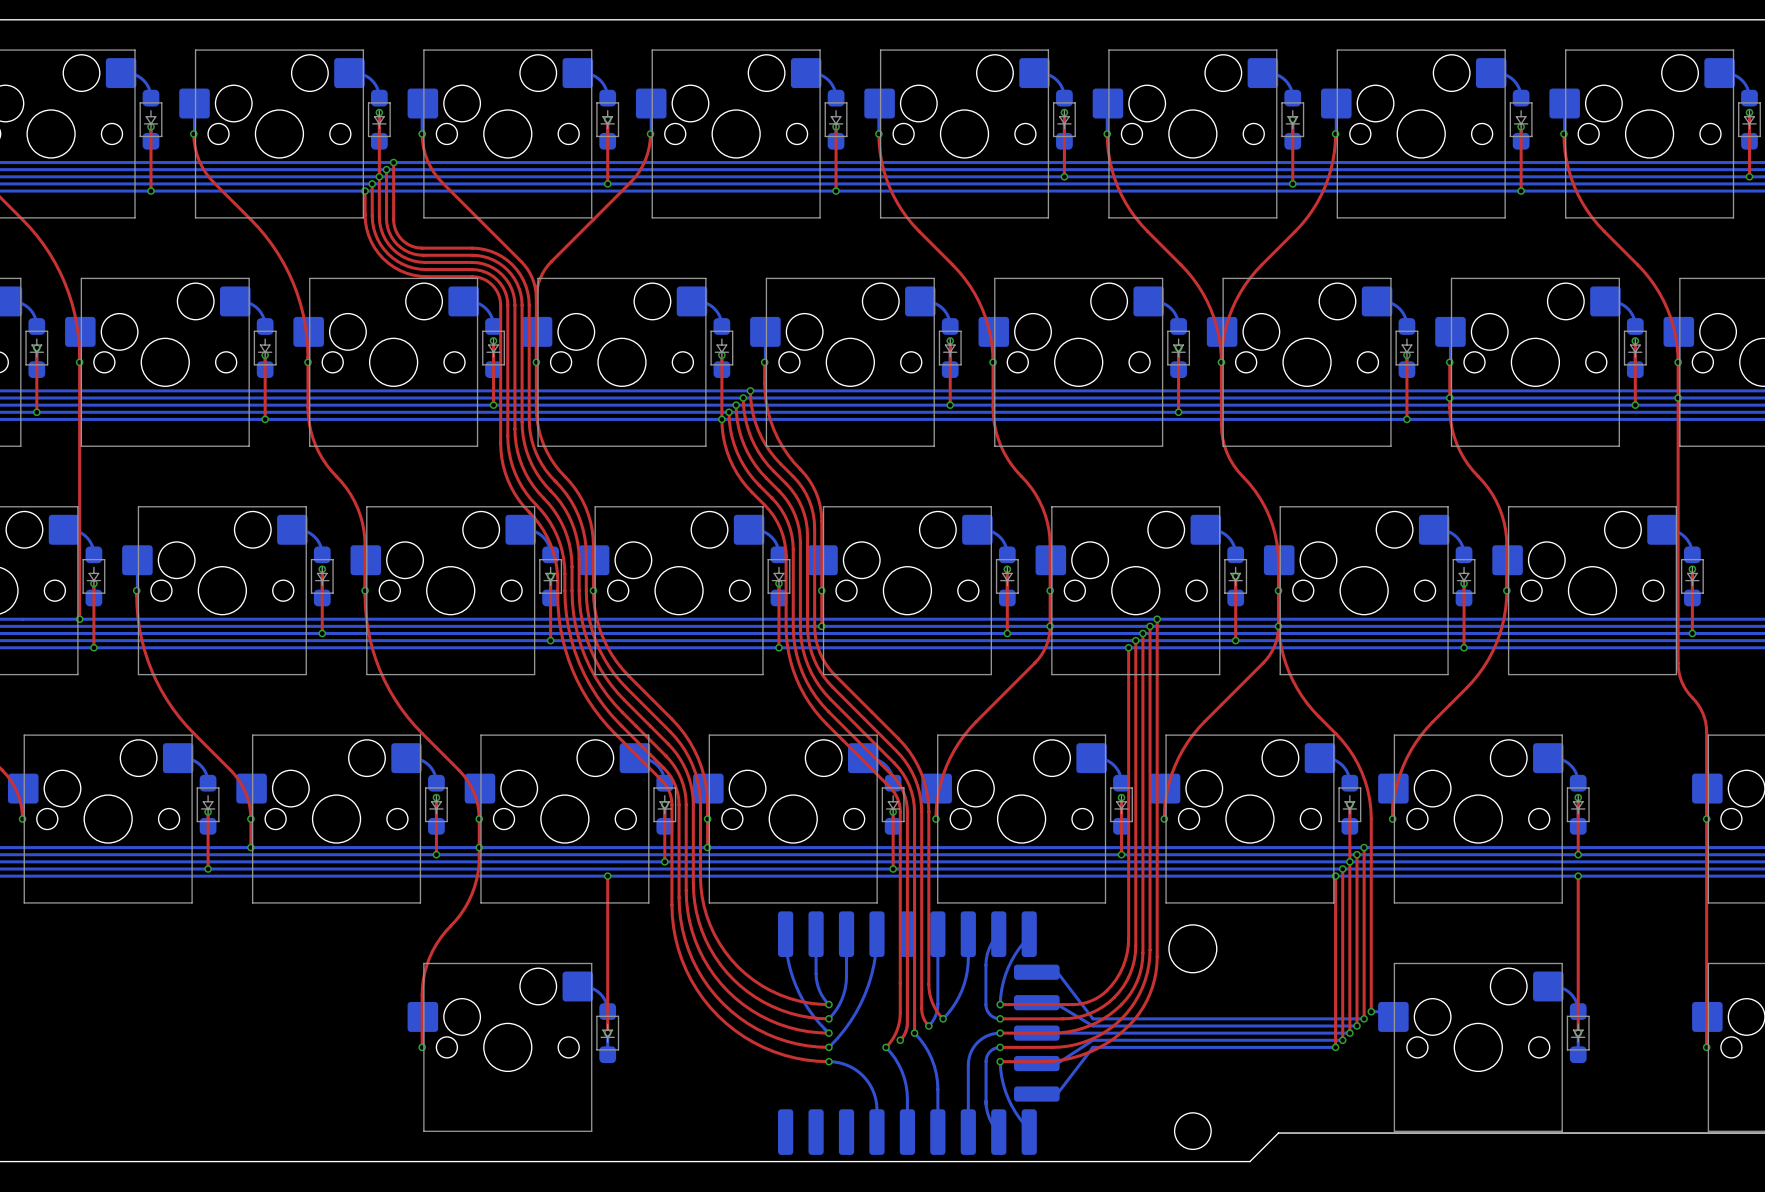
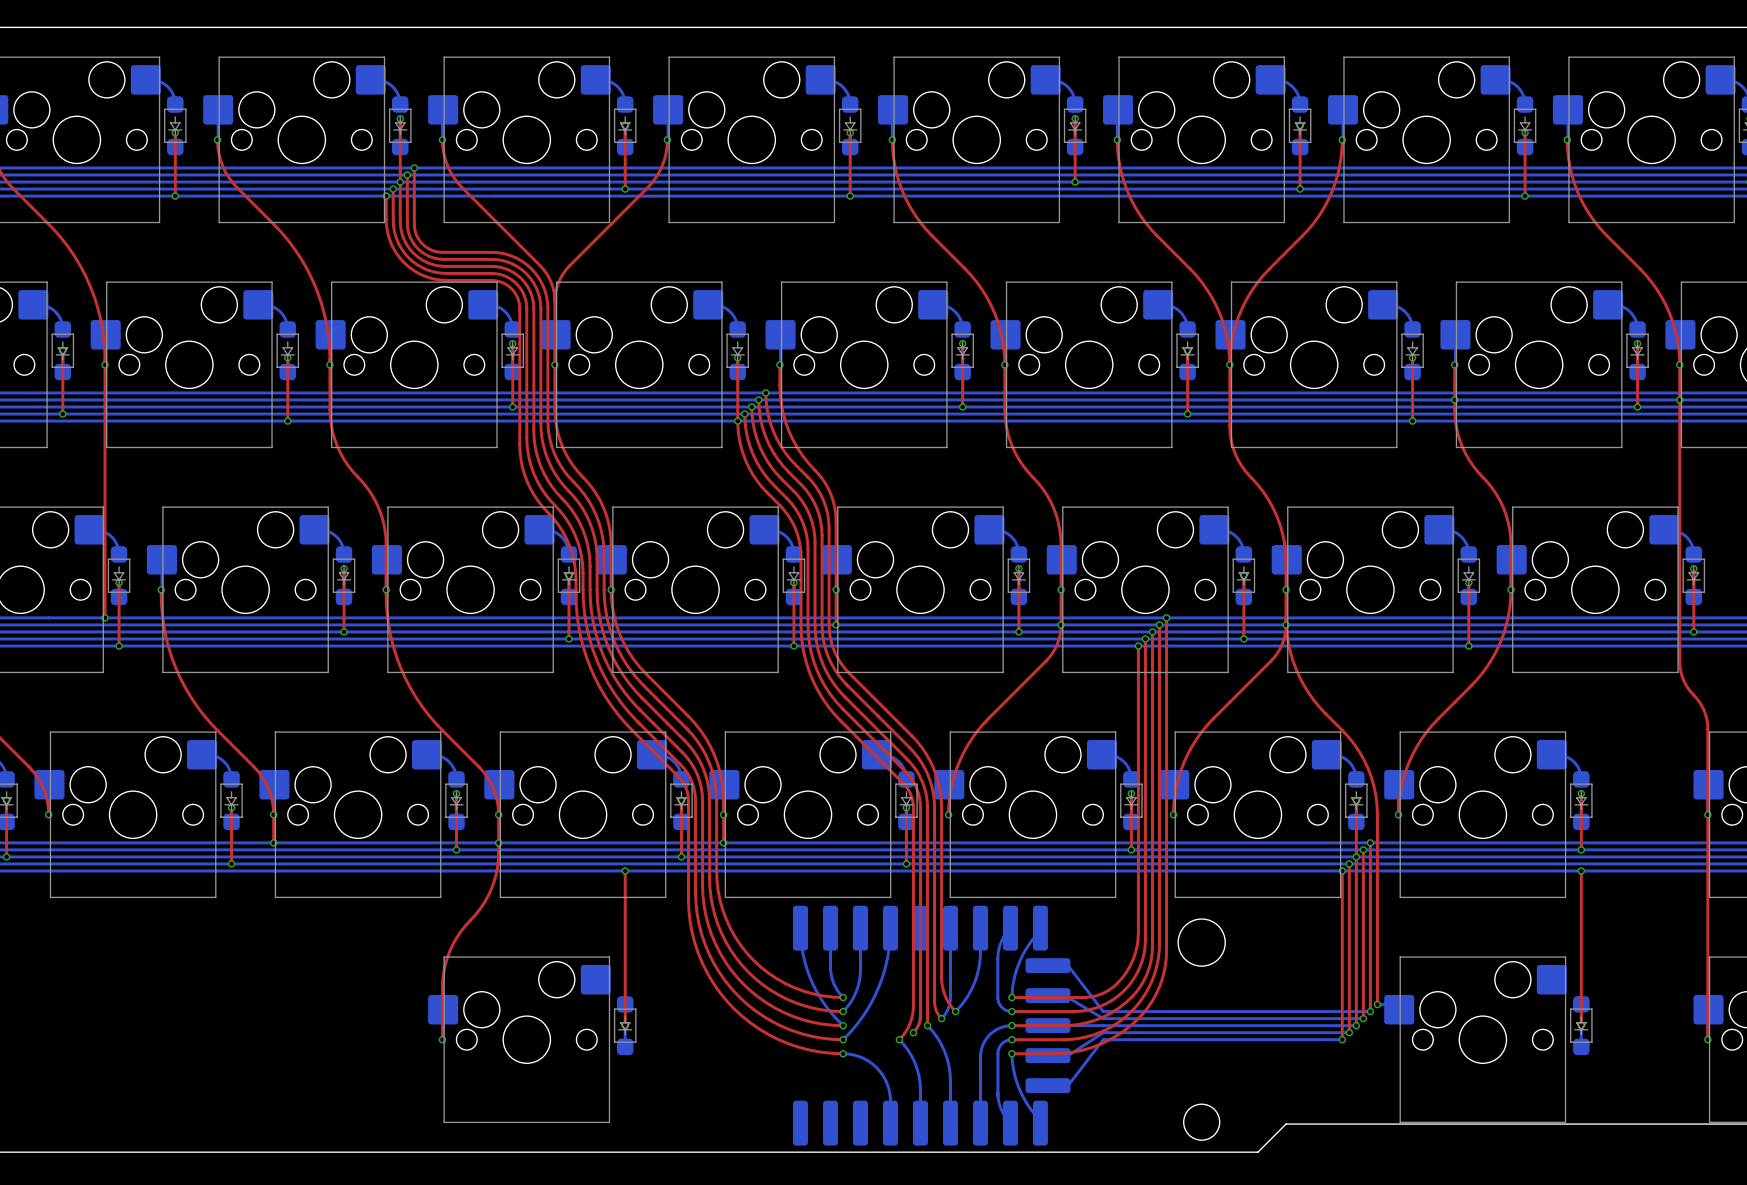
bottom track: (577, 986) (589, 987) (597, 991) (604, 999) (607, 1011) -> none
bottom track: (1548, 986) (1559, 987) (1568, 991) (1574, 999) (1578, 1011) -> none

